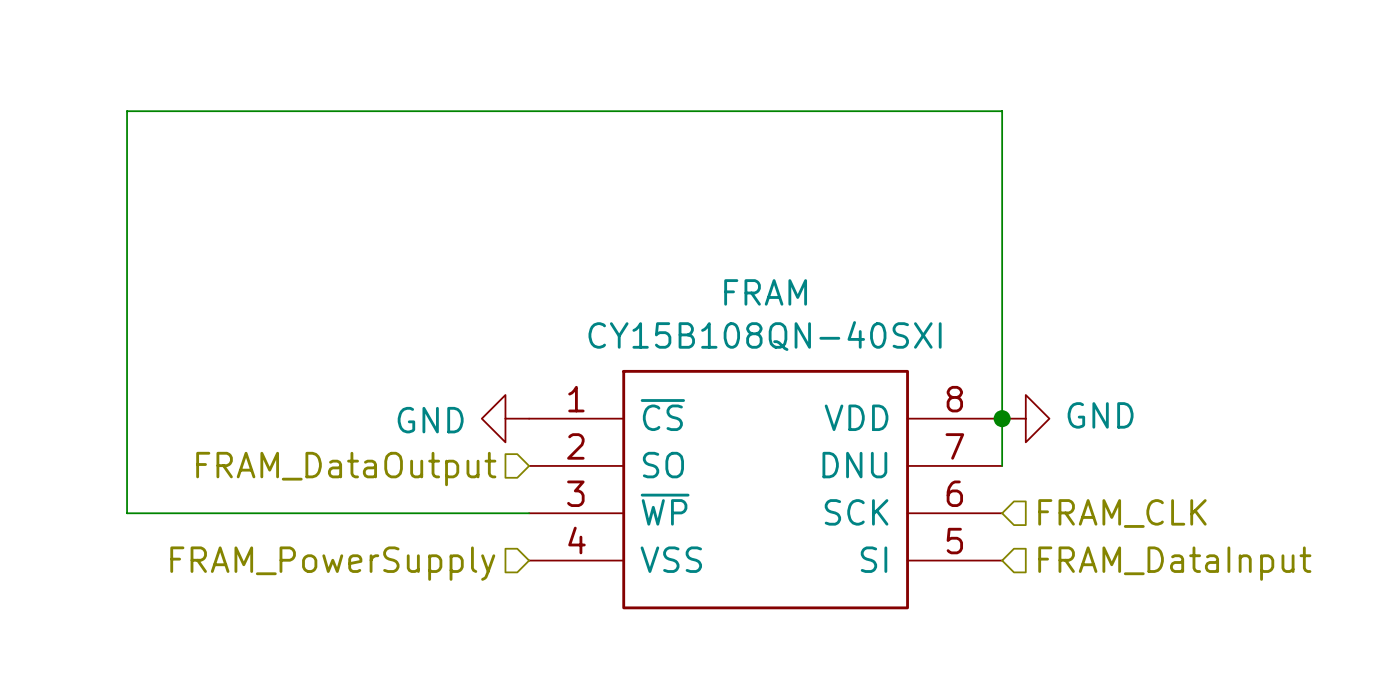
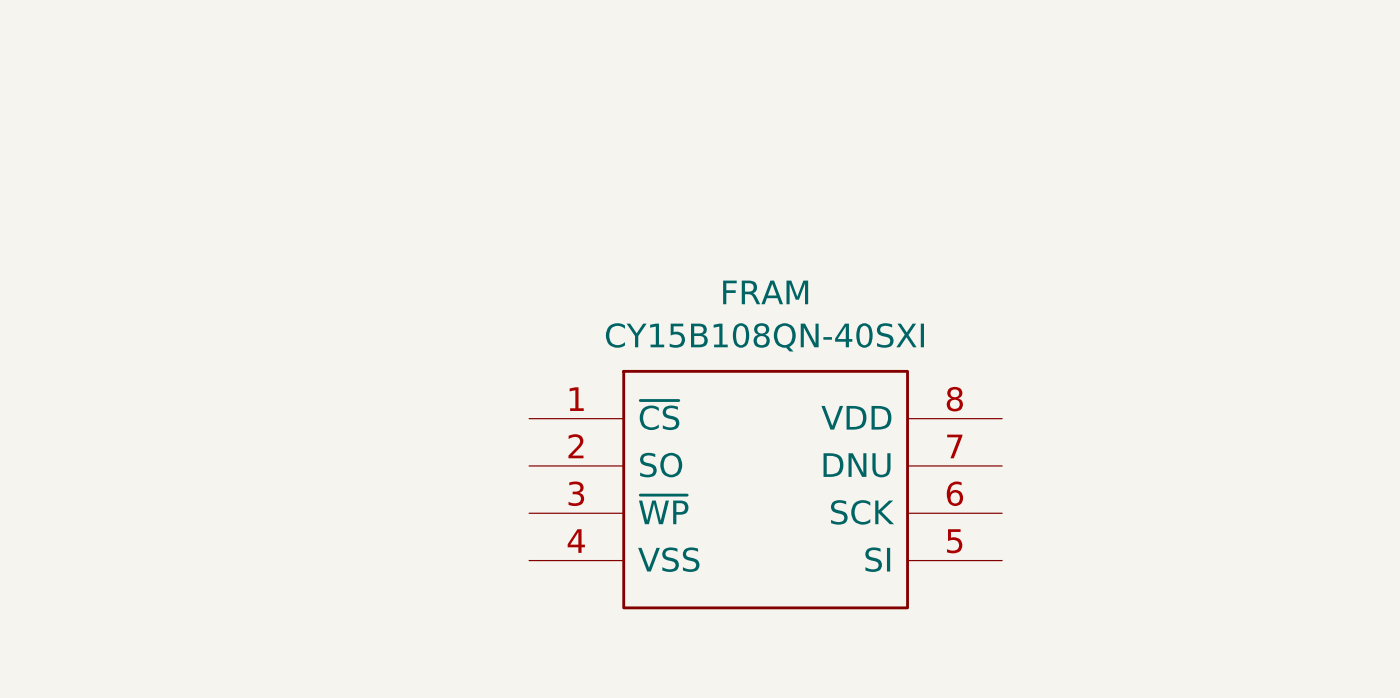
power symbol: GND (505, 418) -> none
junction: (1002, 418) -> none
power symbol: GND (1025, 418) -> none
wire: (1002, 465) (1002, 111) (127, 111) (127, 513) (529, 513) -> none
hierarchical label: FRAM_DataOutput (346, 469) -> none
hierarchical label: FRAM_CLK (1122, 513) -> none
hierarchical label: FRAM_PowerSupply (332, 563) -> none
hierarchical label: FRAM_DataInput (1174, 563) -> none

